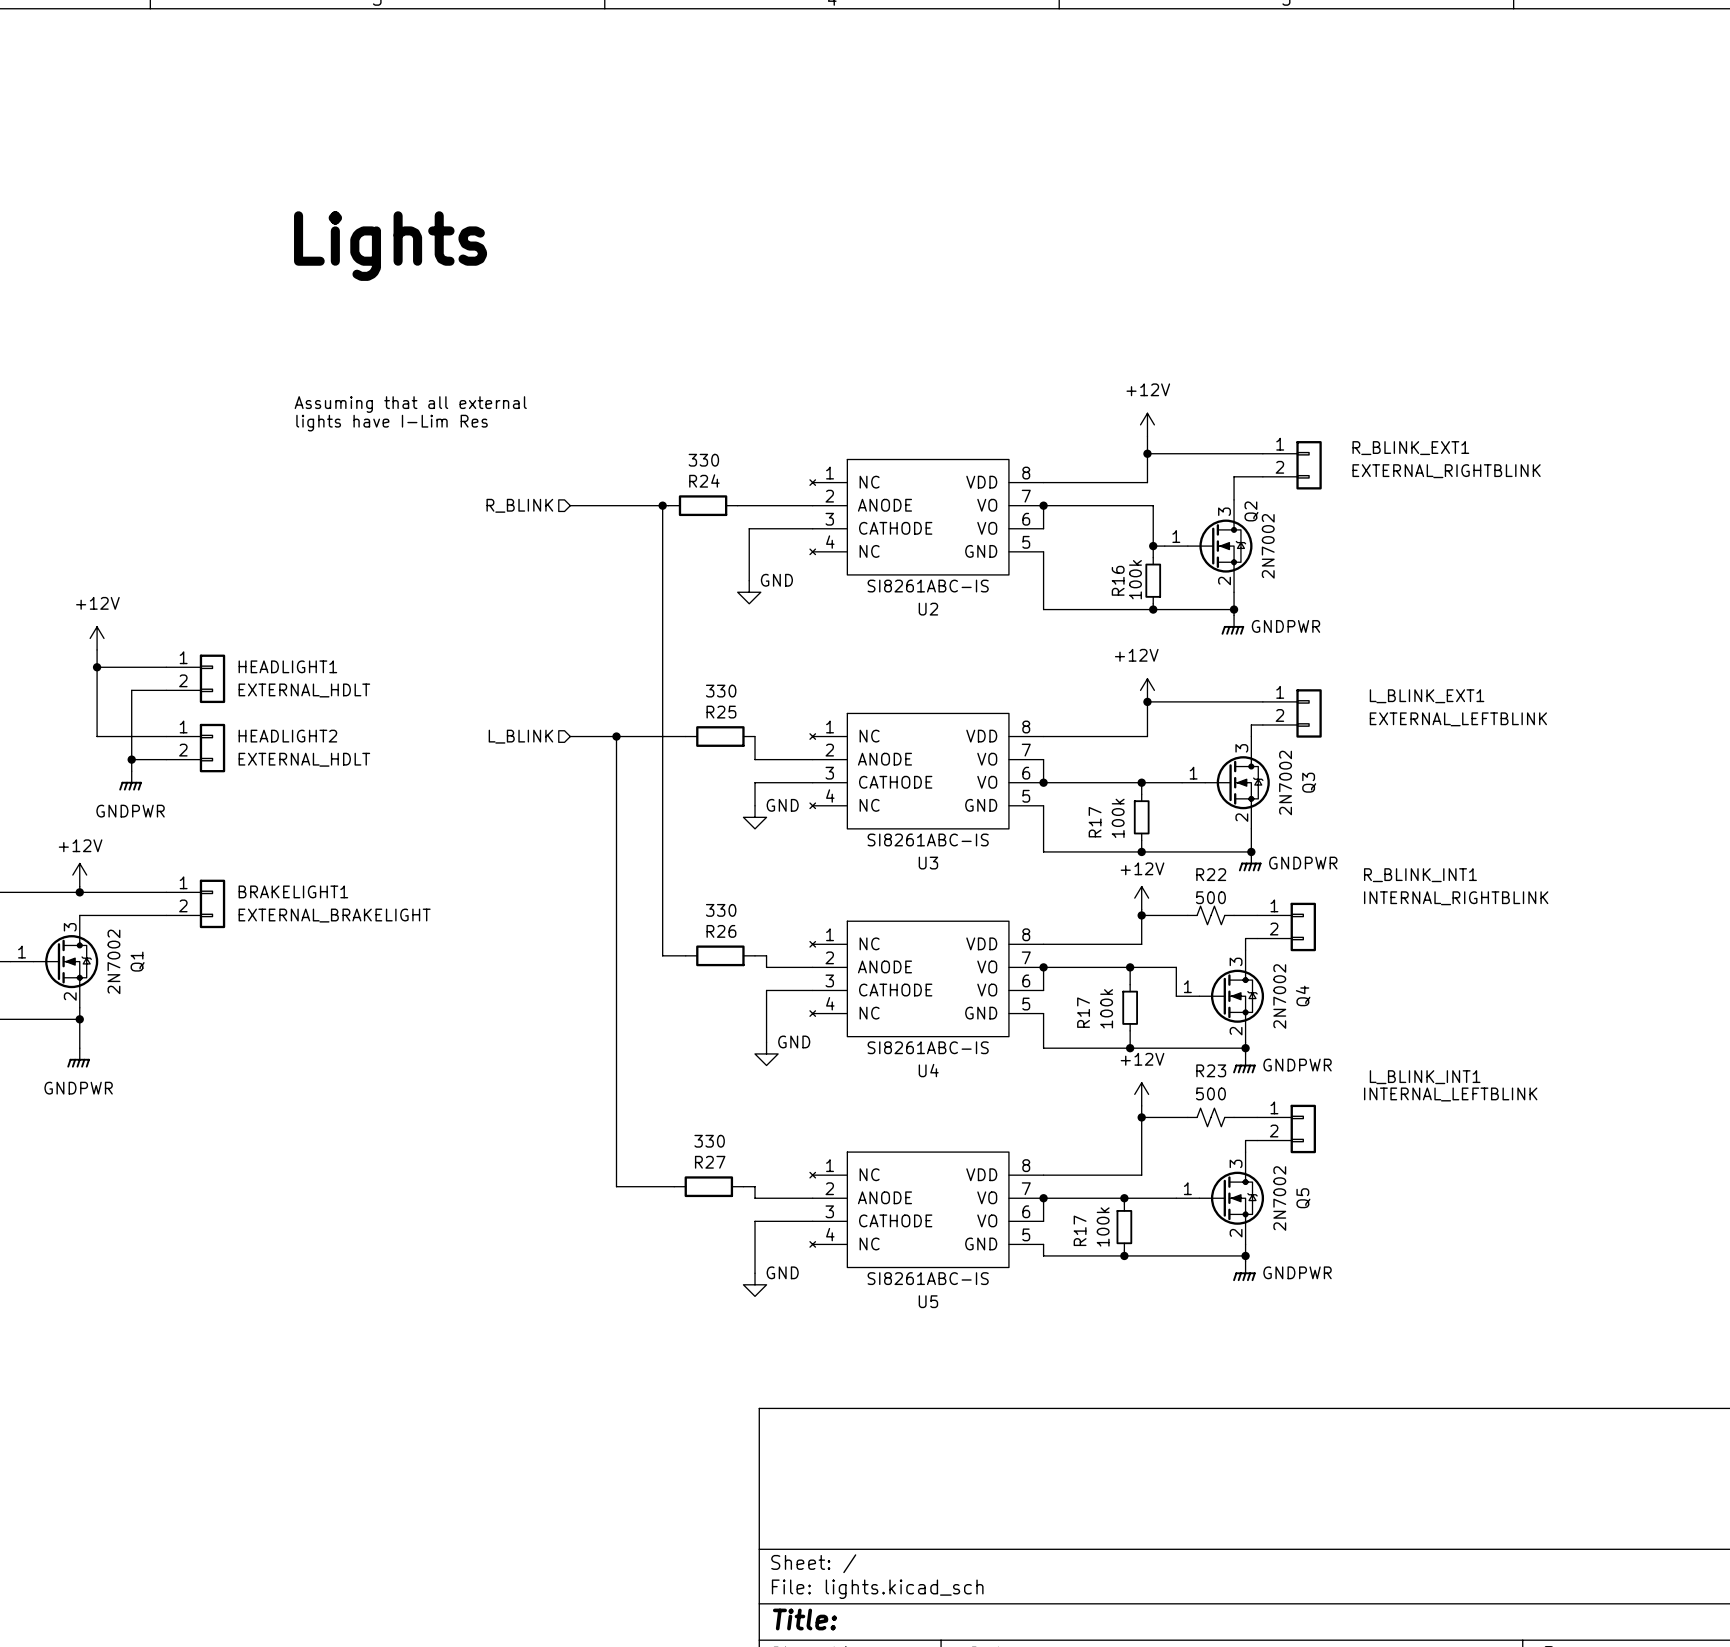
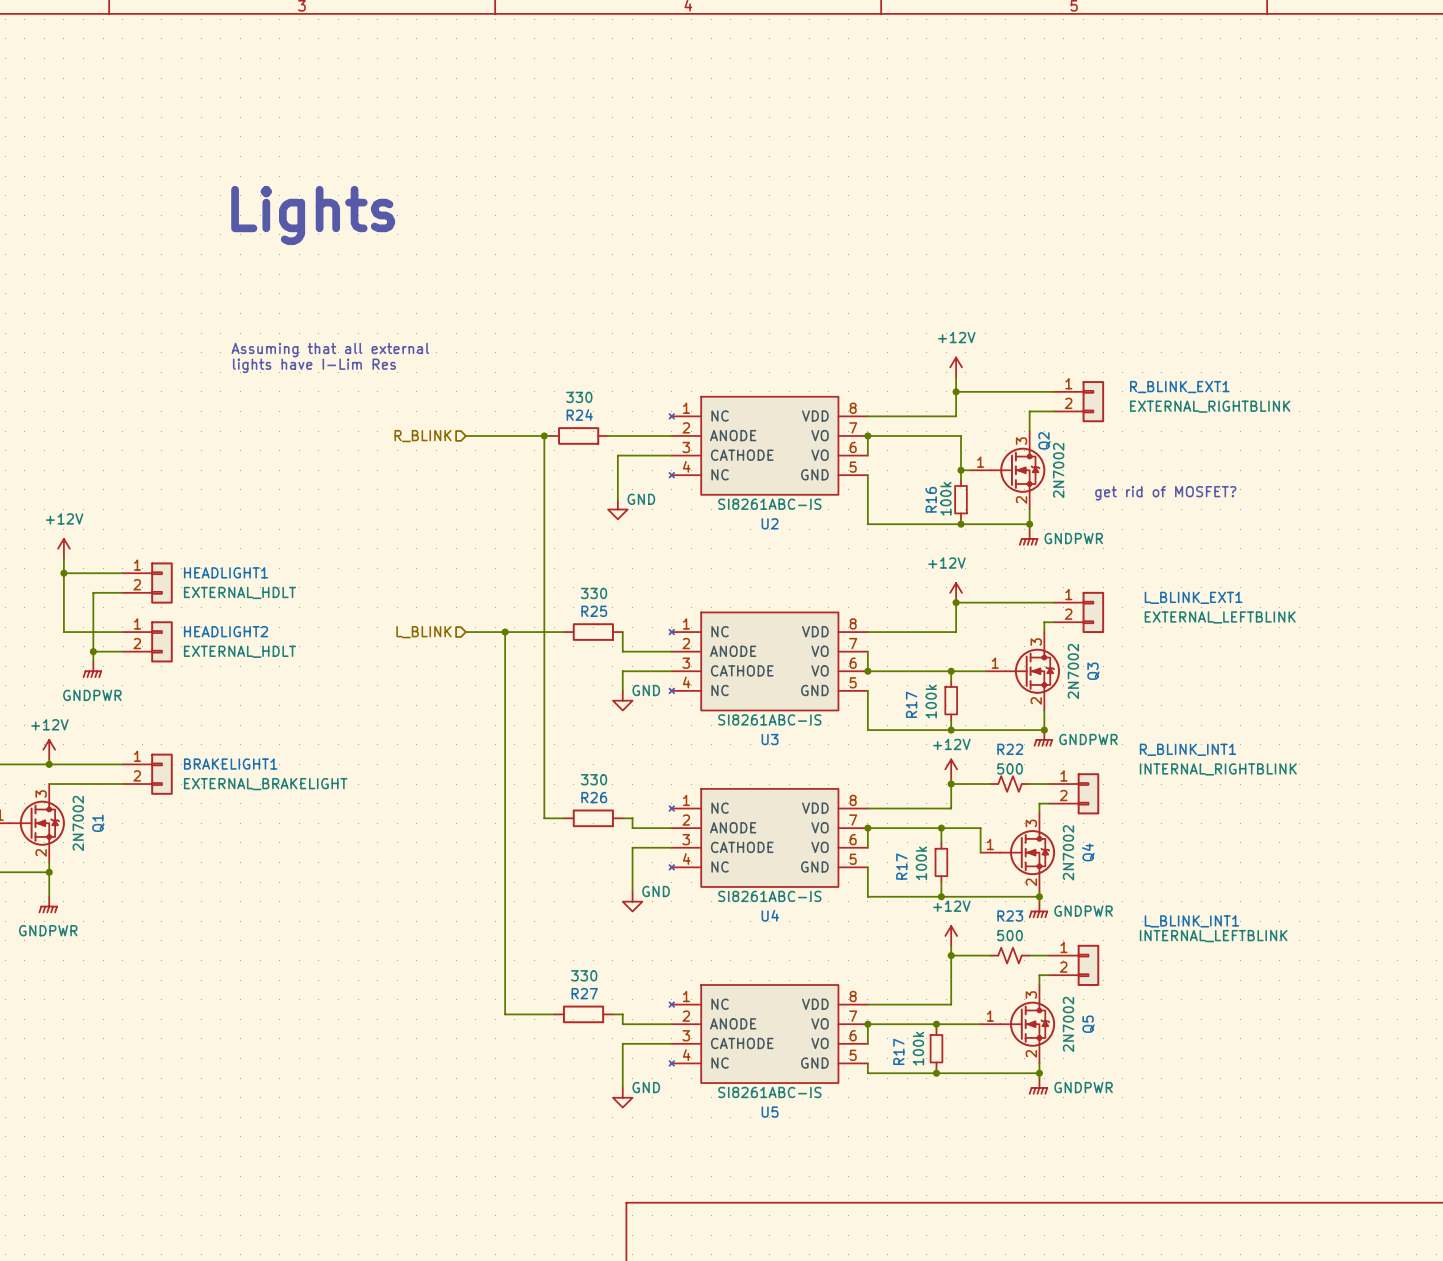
text: none -> get rid of MOSFET? (1165, 493)

